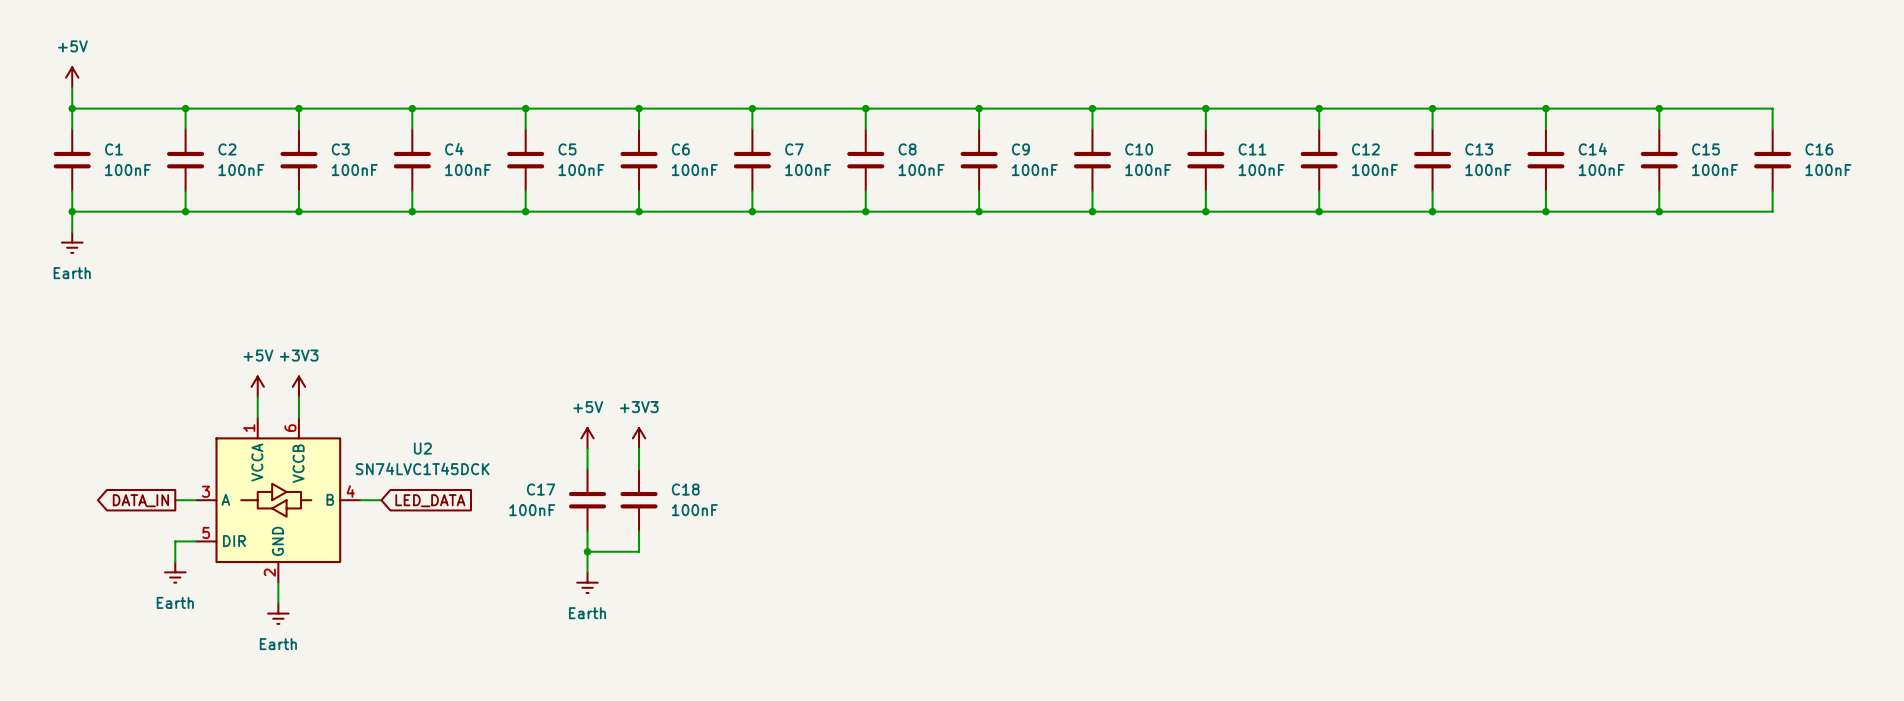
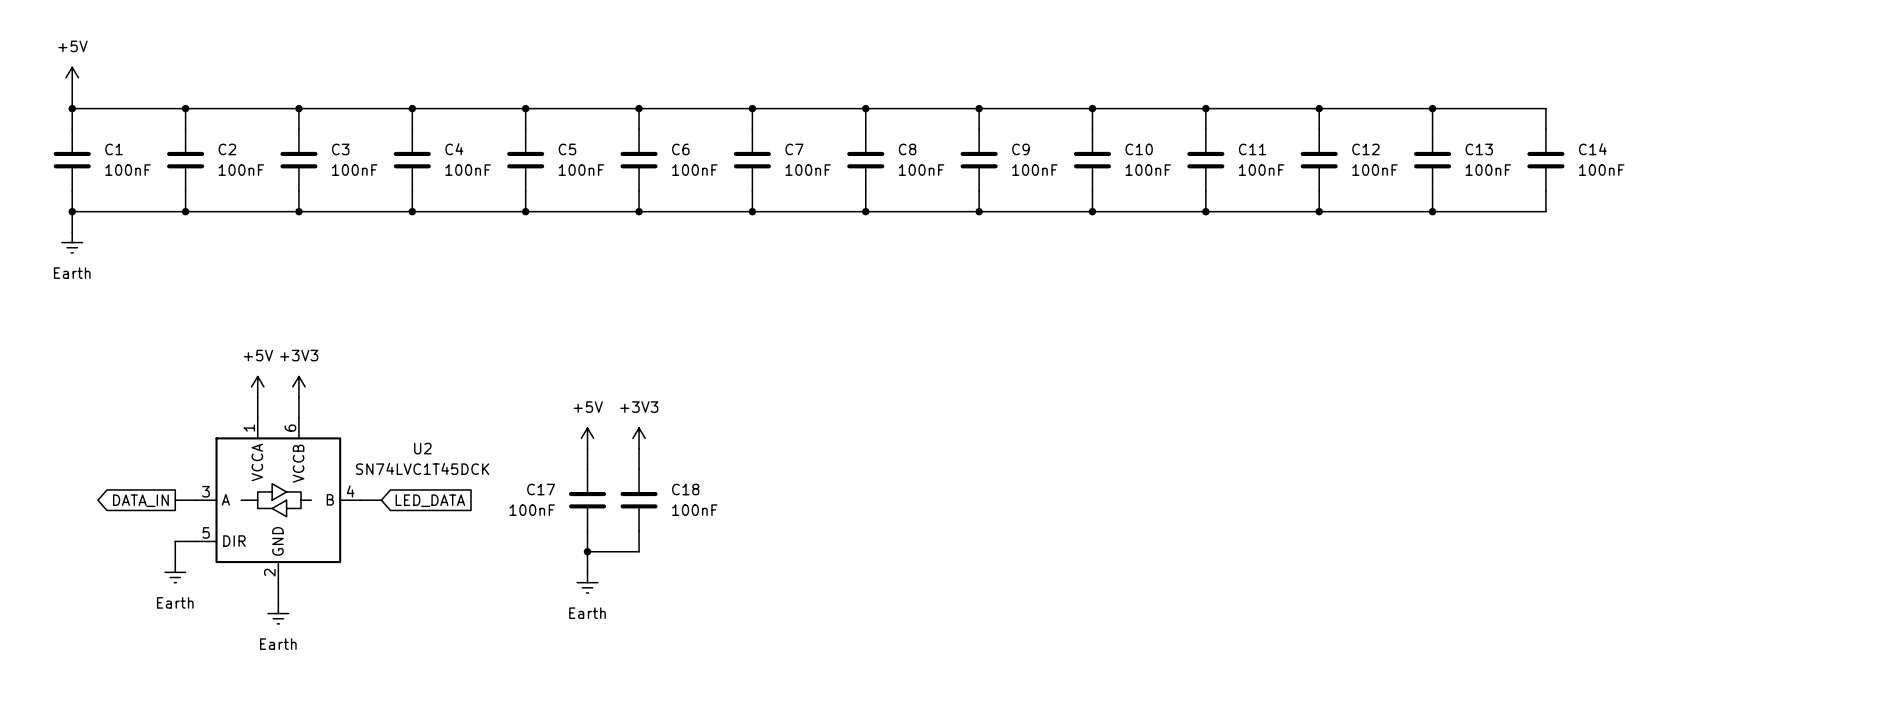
wire: (1545, 108) (1772, 108) (1772, 129) -> none
junction: (1545, 108) -> none
wire: (1659, 108) (1659, 129) -> none
junction: (1659, 108) -> none
C15: 100nF (1659, 160) -> none
C16: 100nF (1772, 160) -> none
wire: (1659, 191) (1659, 211) -> none
wire: (1772, 191) (1772, 211) (1545, 211) -> none
junction: (1545, 211) -> none
junction: (1659, 211) -> none

